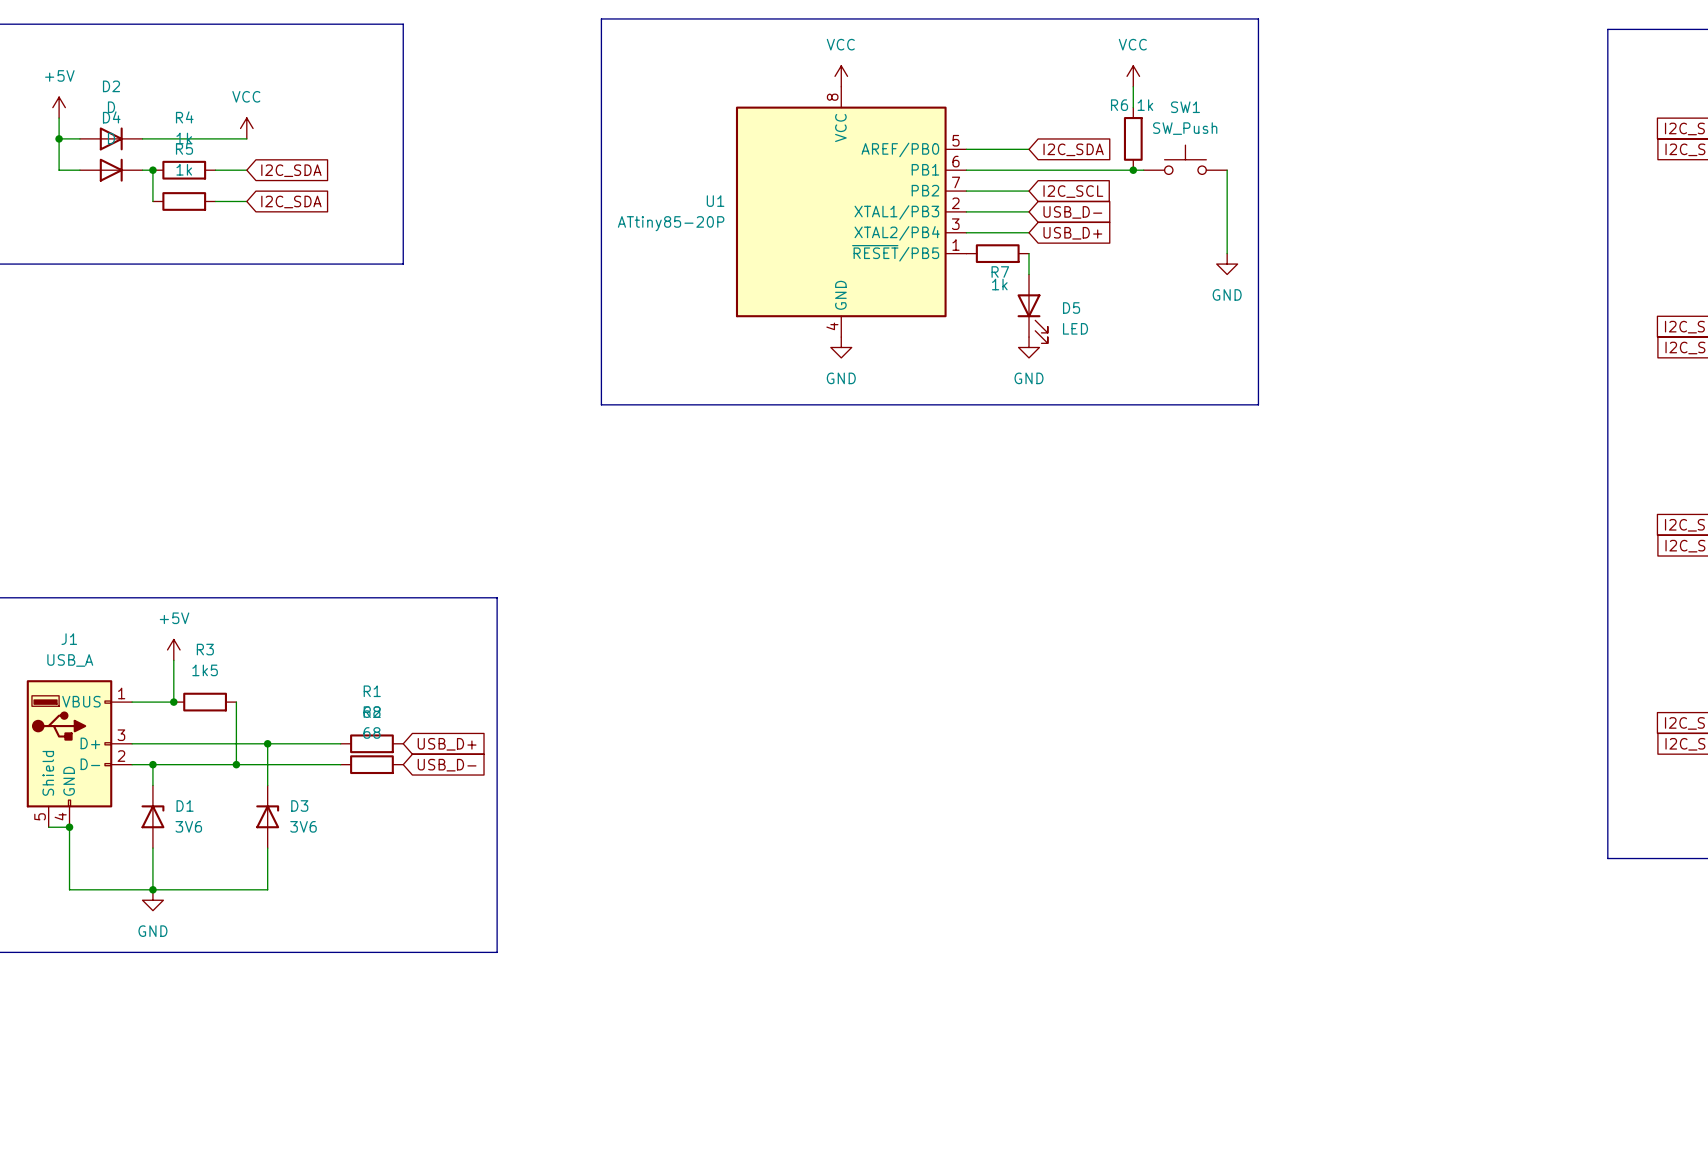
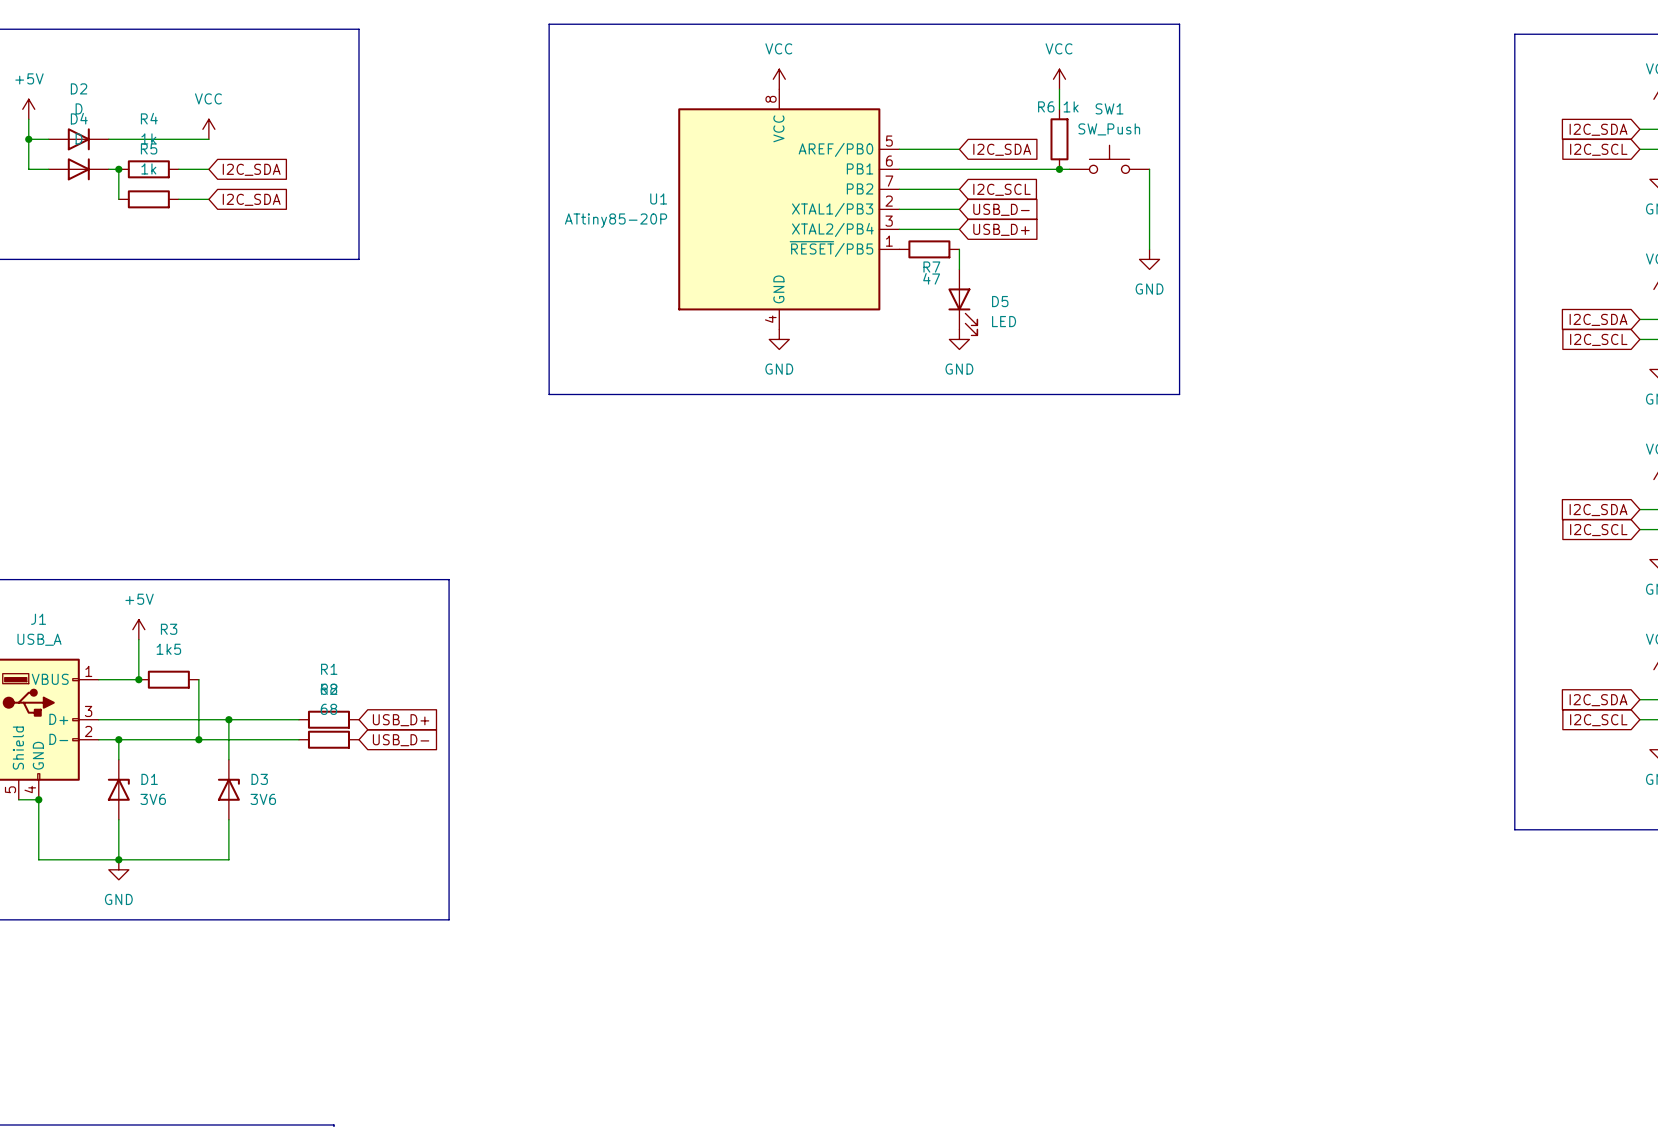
R7 value: 1k (999, 284) -> 47 (931, 278)

